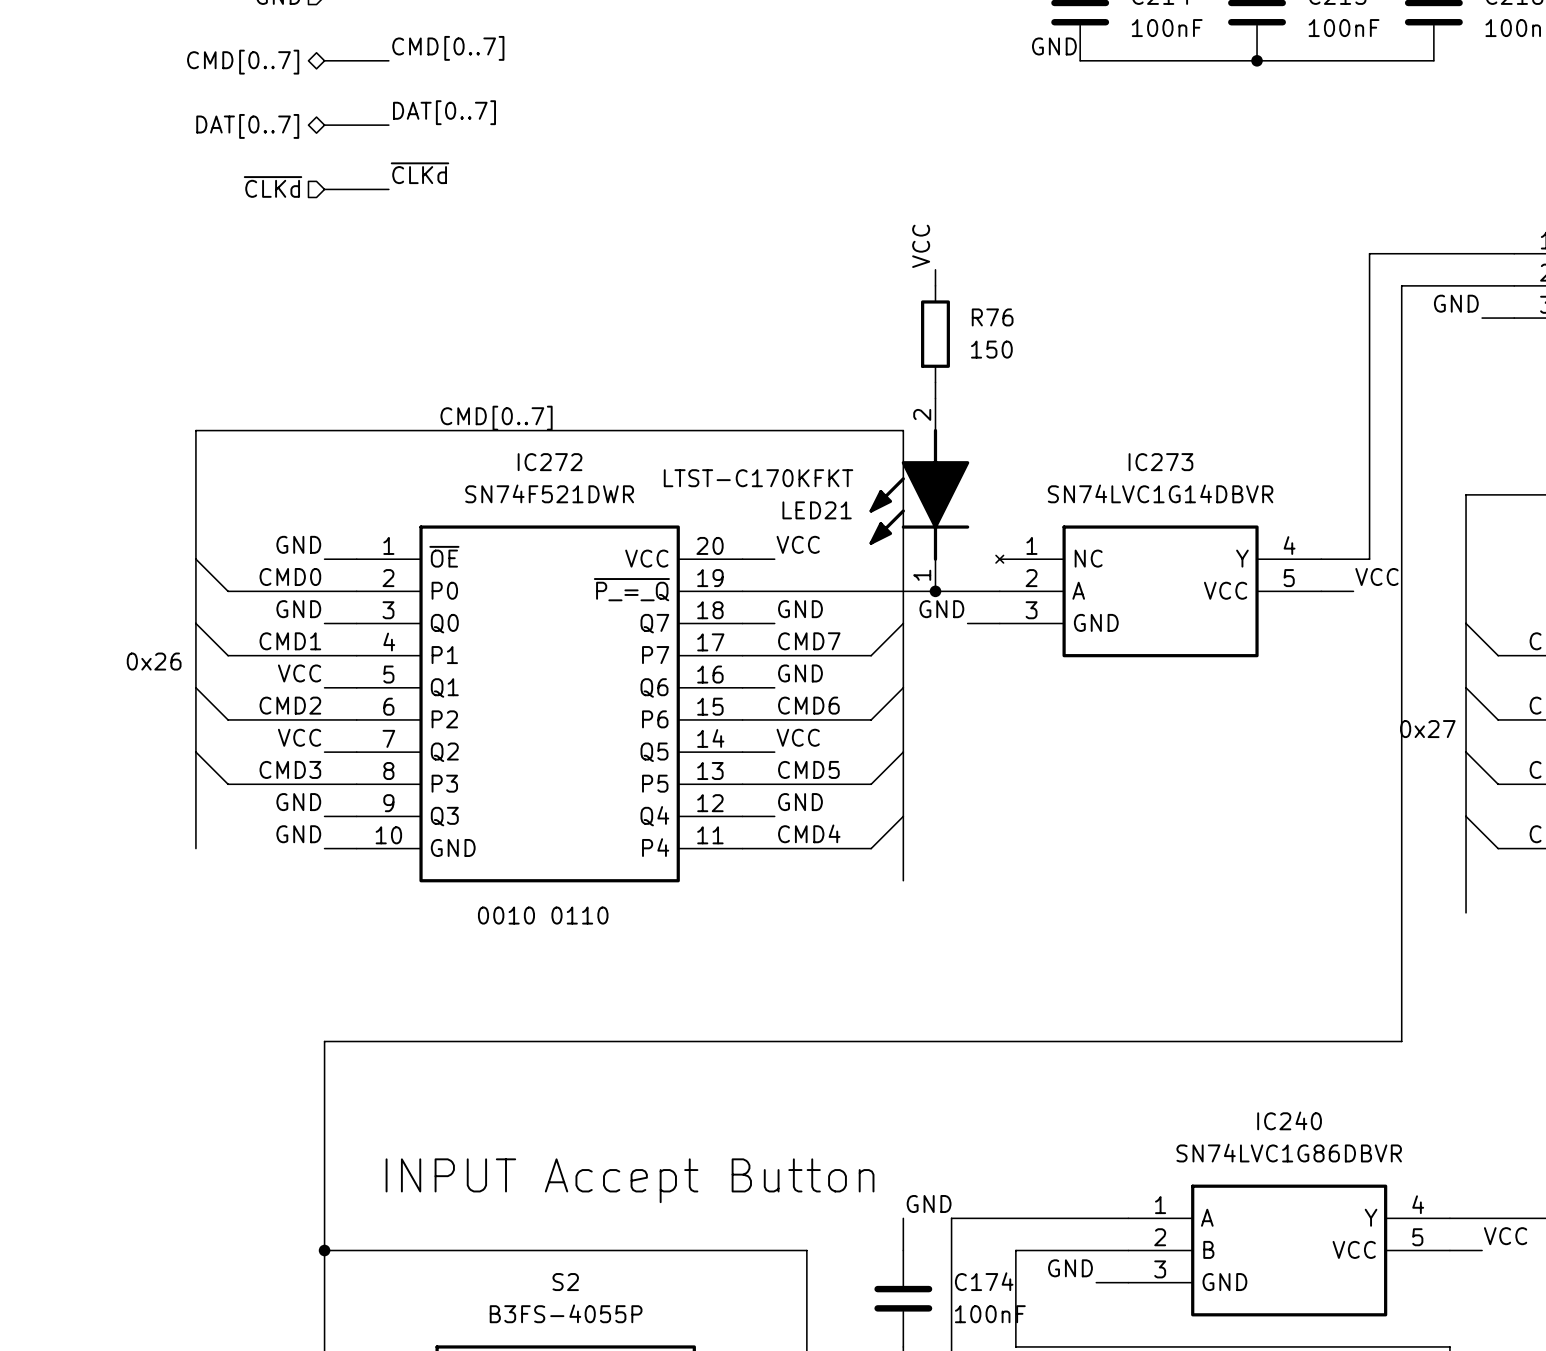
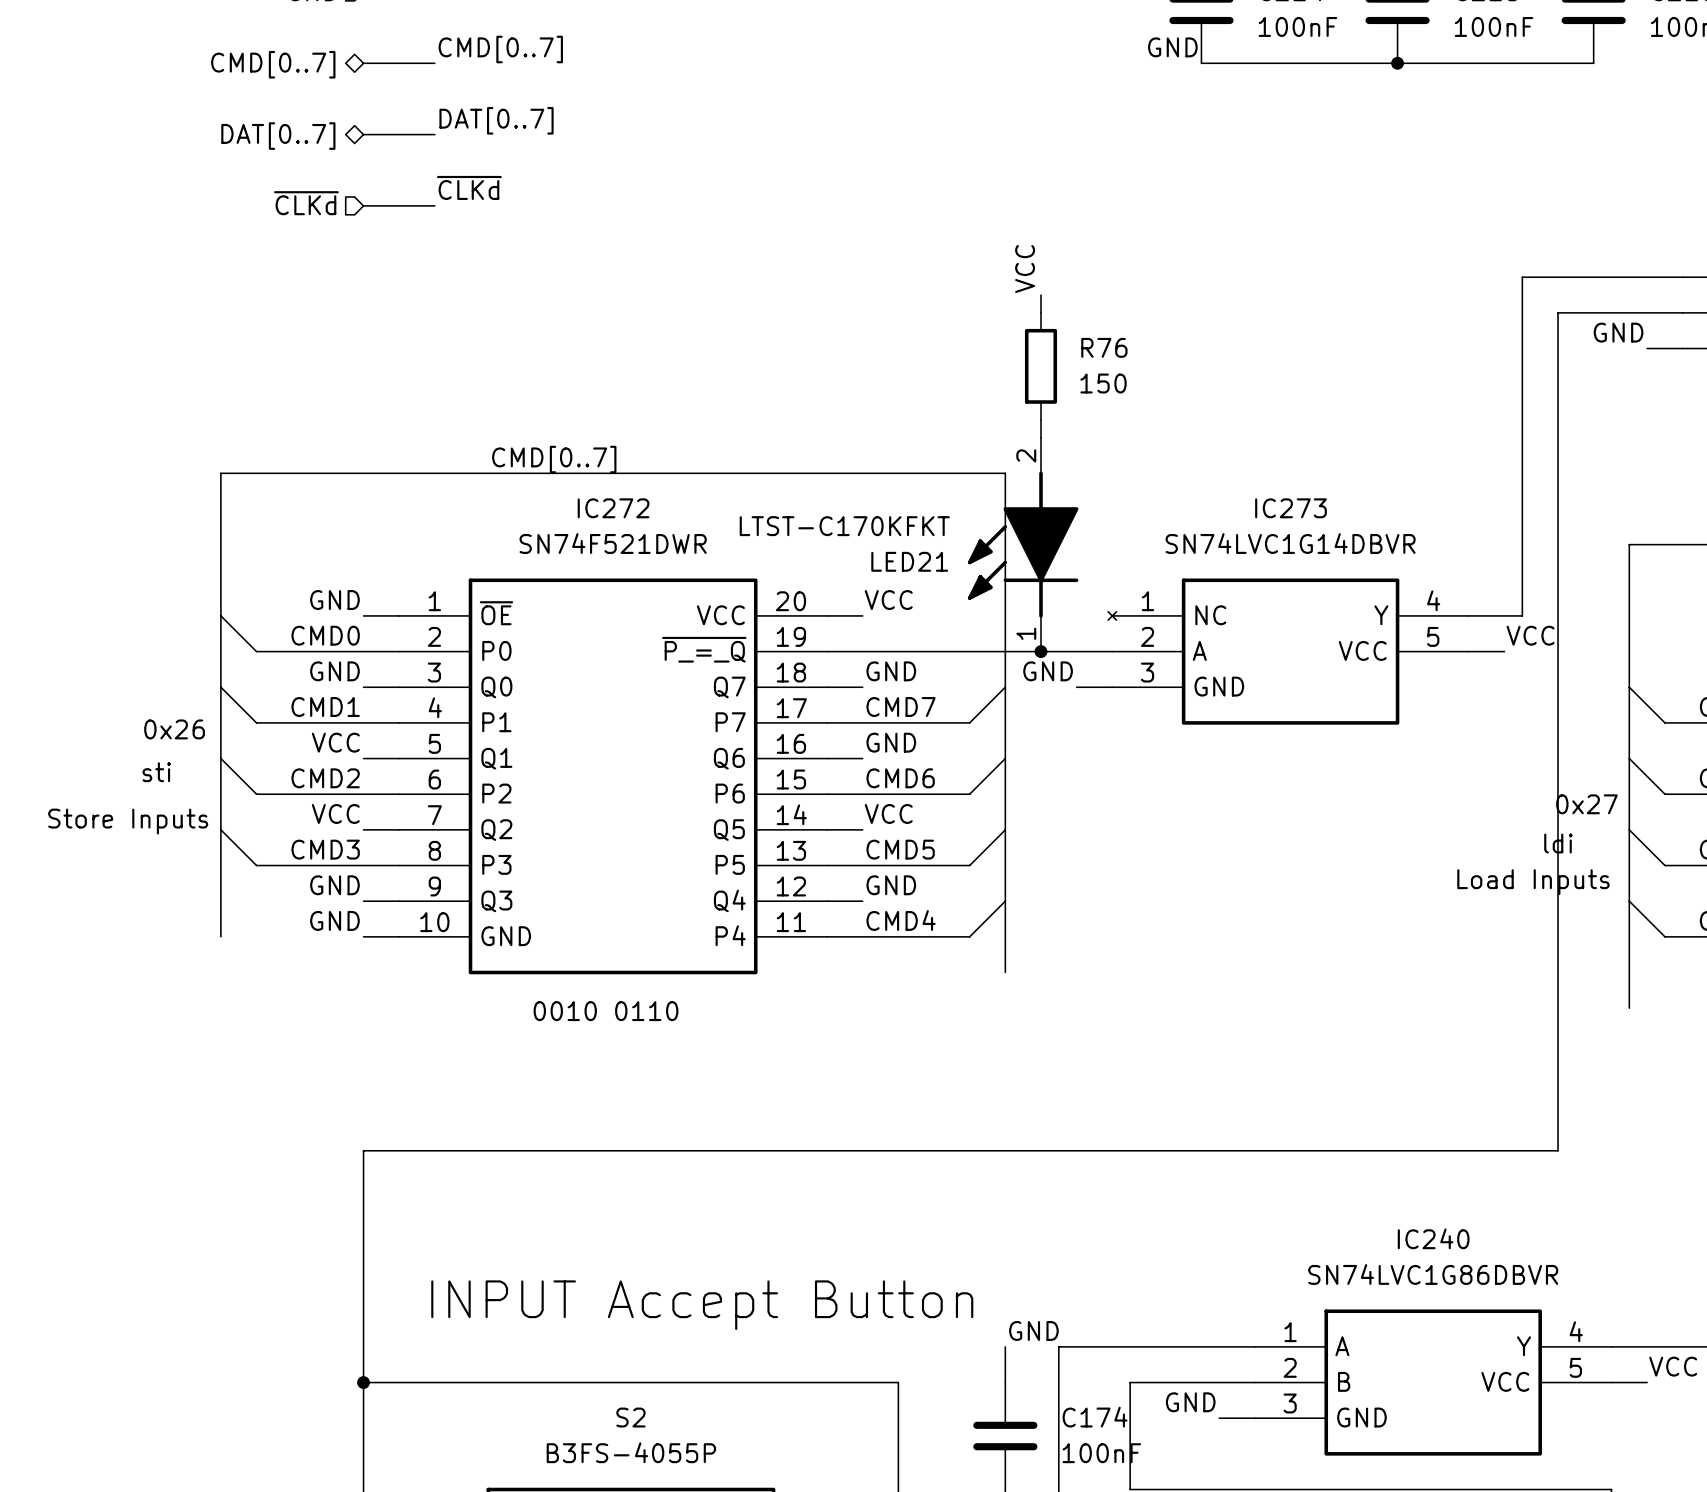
text: none -> sti (156, 772)
text: none -> Store Inputs (128, 821)
text: none -> ldi (1558, 843)
text: none -> Load Inputs (1533, 882)

